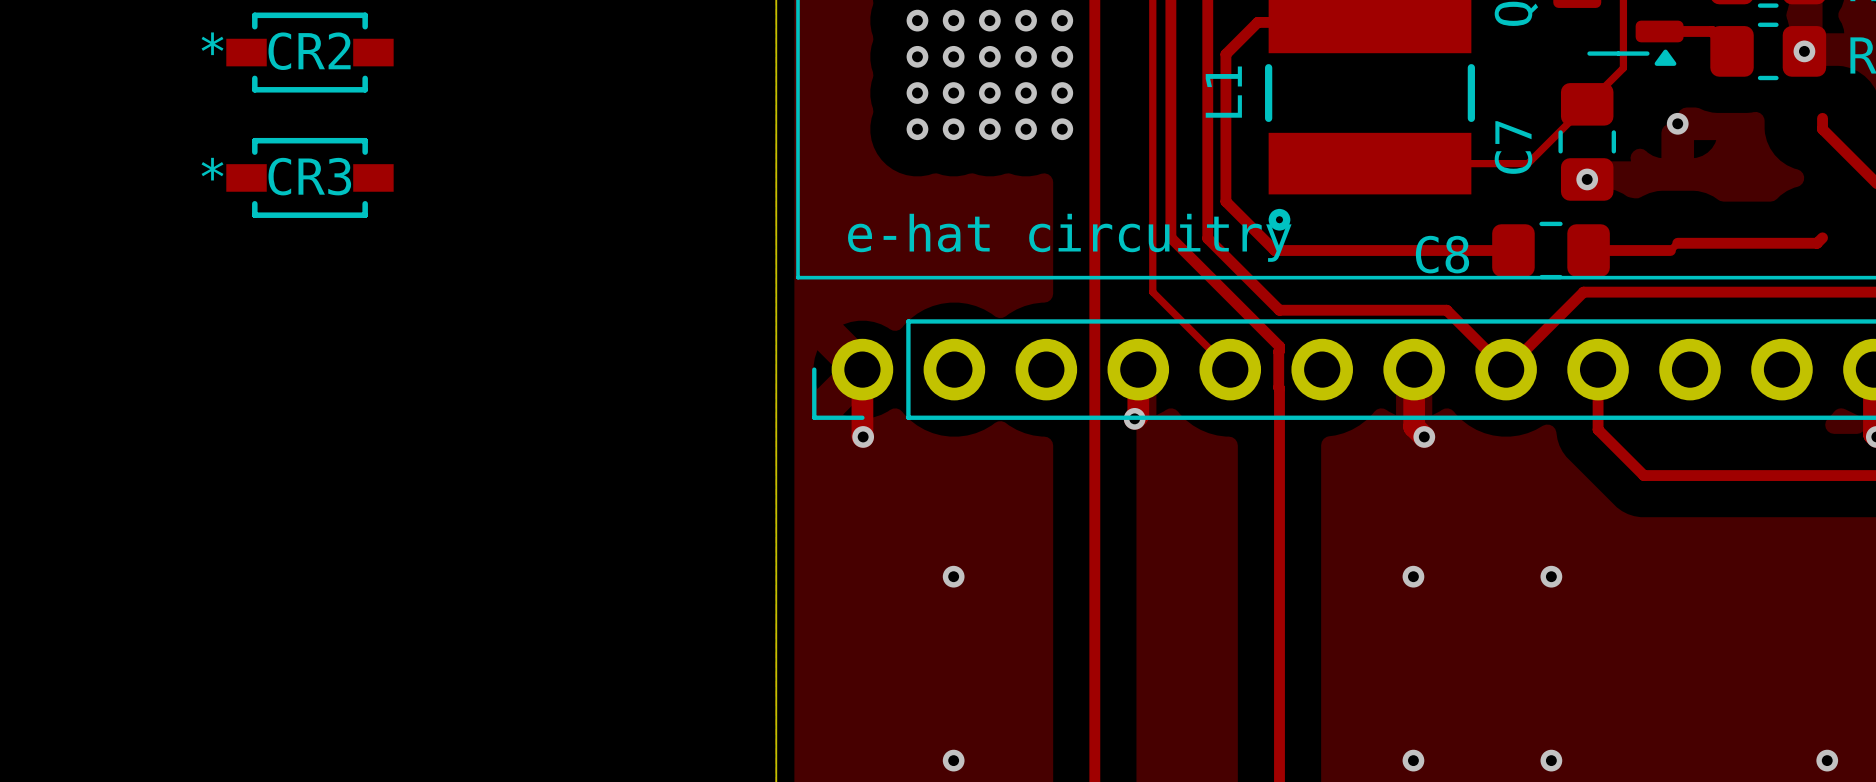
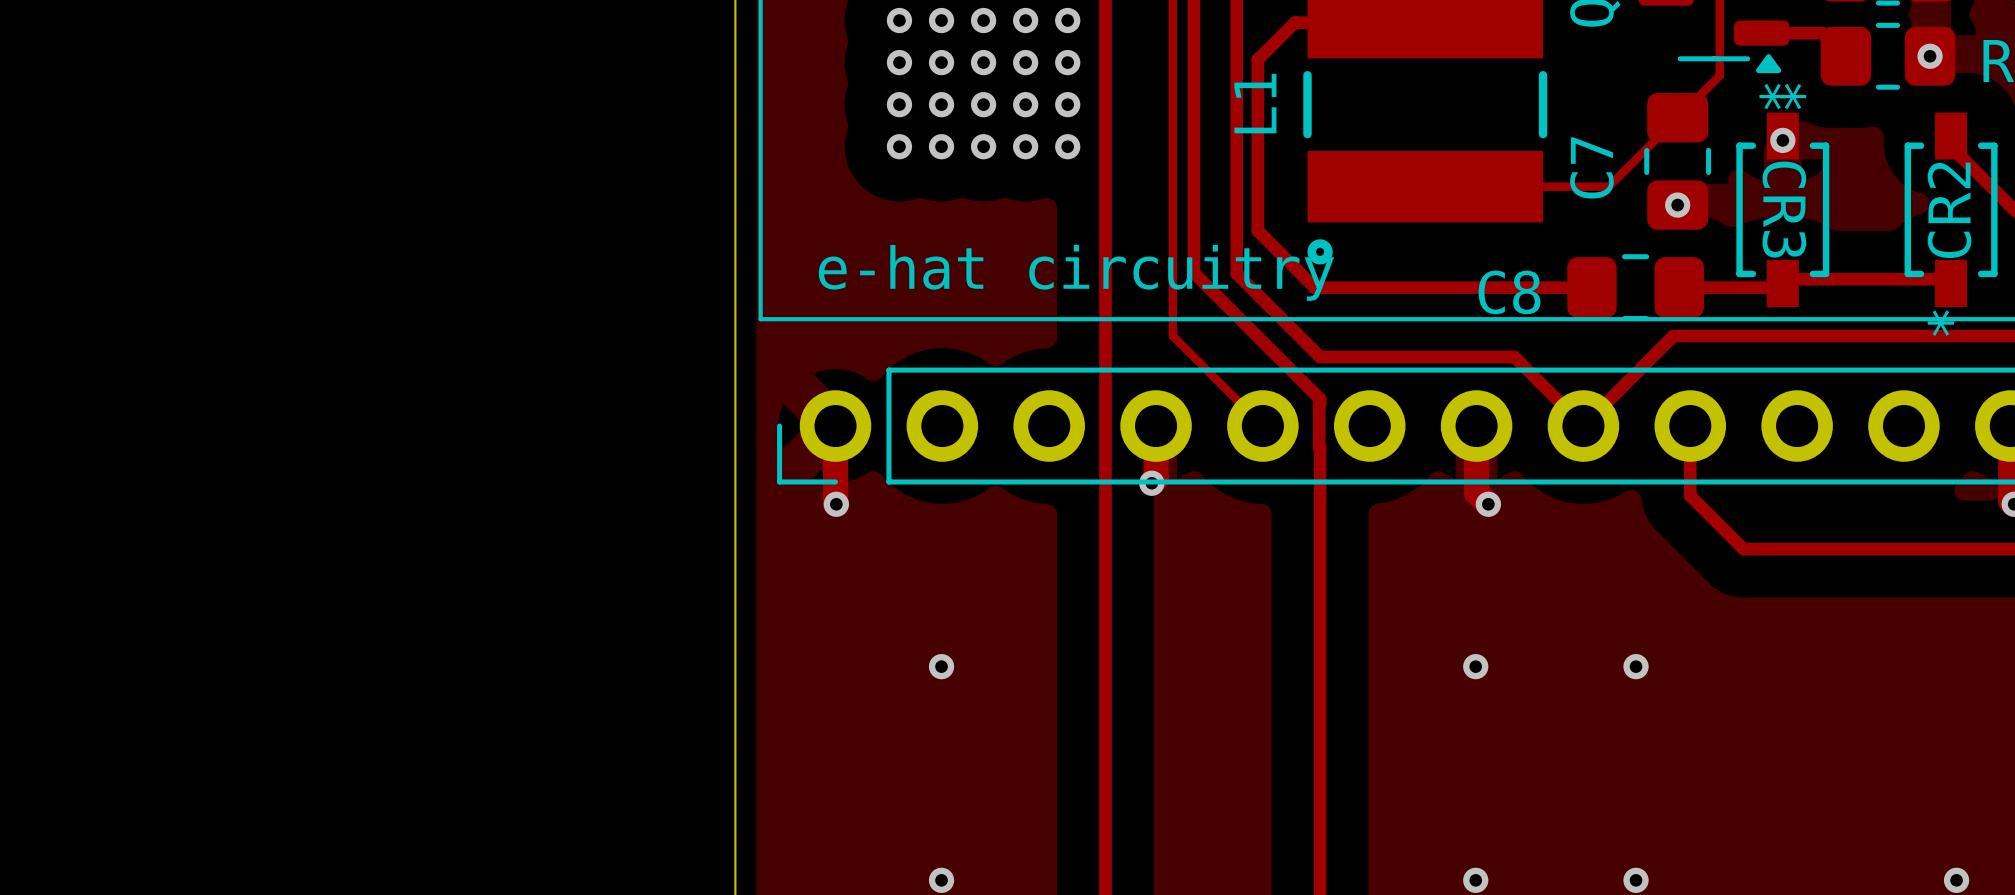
CR2 rotation: 0° (309, 52) -> 90° counterclockwise (1951, 209)
CR2 position: (309, 52) -> (1951, 209)
CR3 rotation: 0° (309, 177) -> 90° clockwise (1782, 209)
CR3 position: (309, 177) -> (1782, 209)

